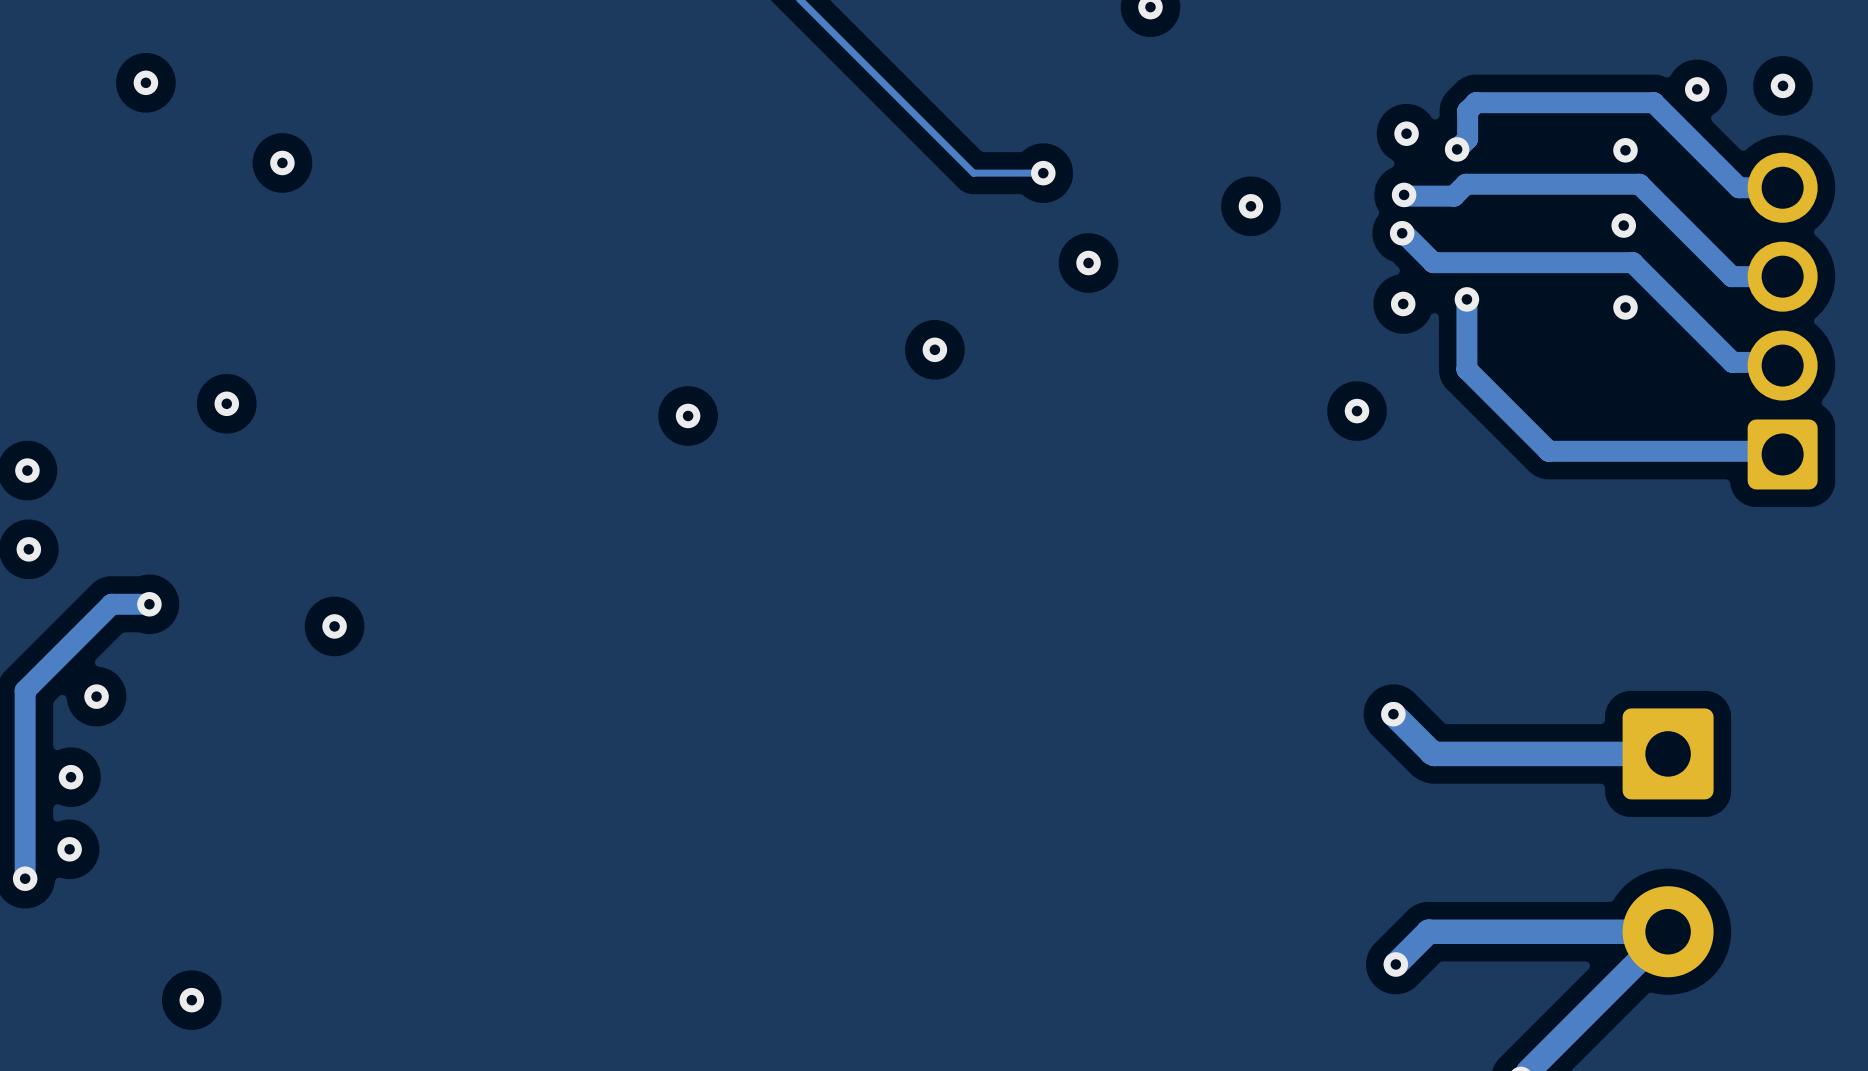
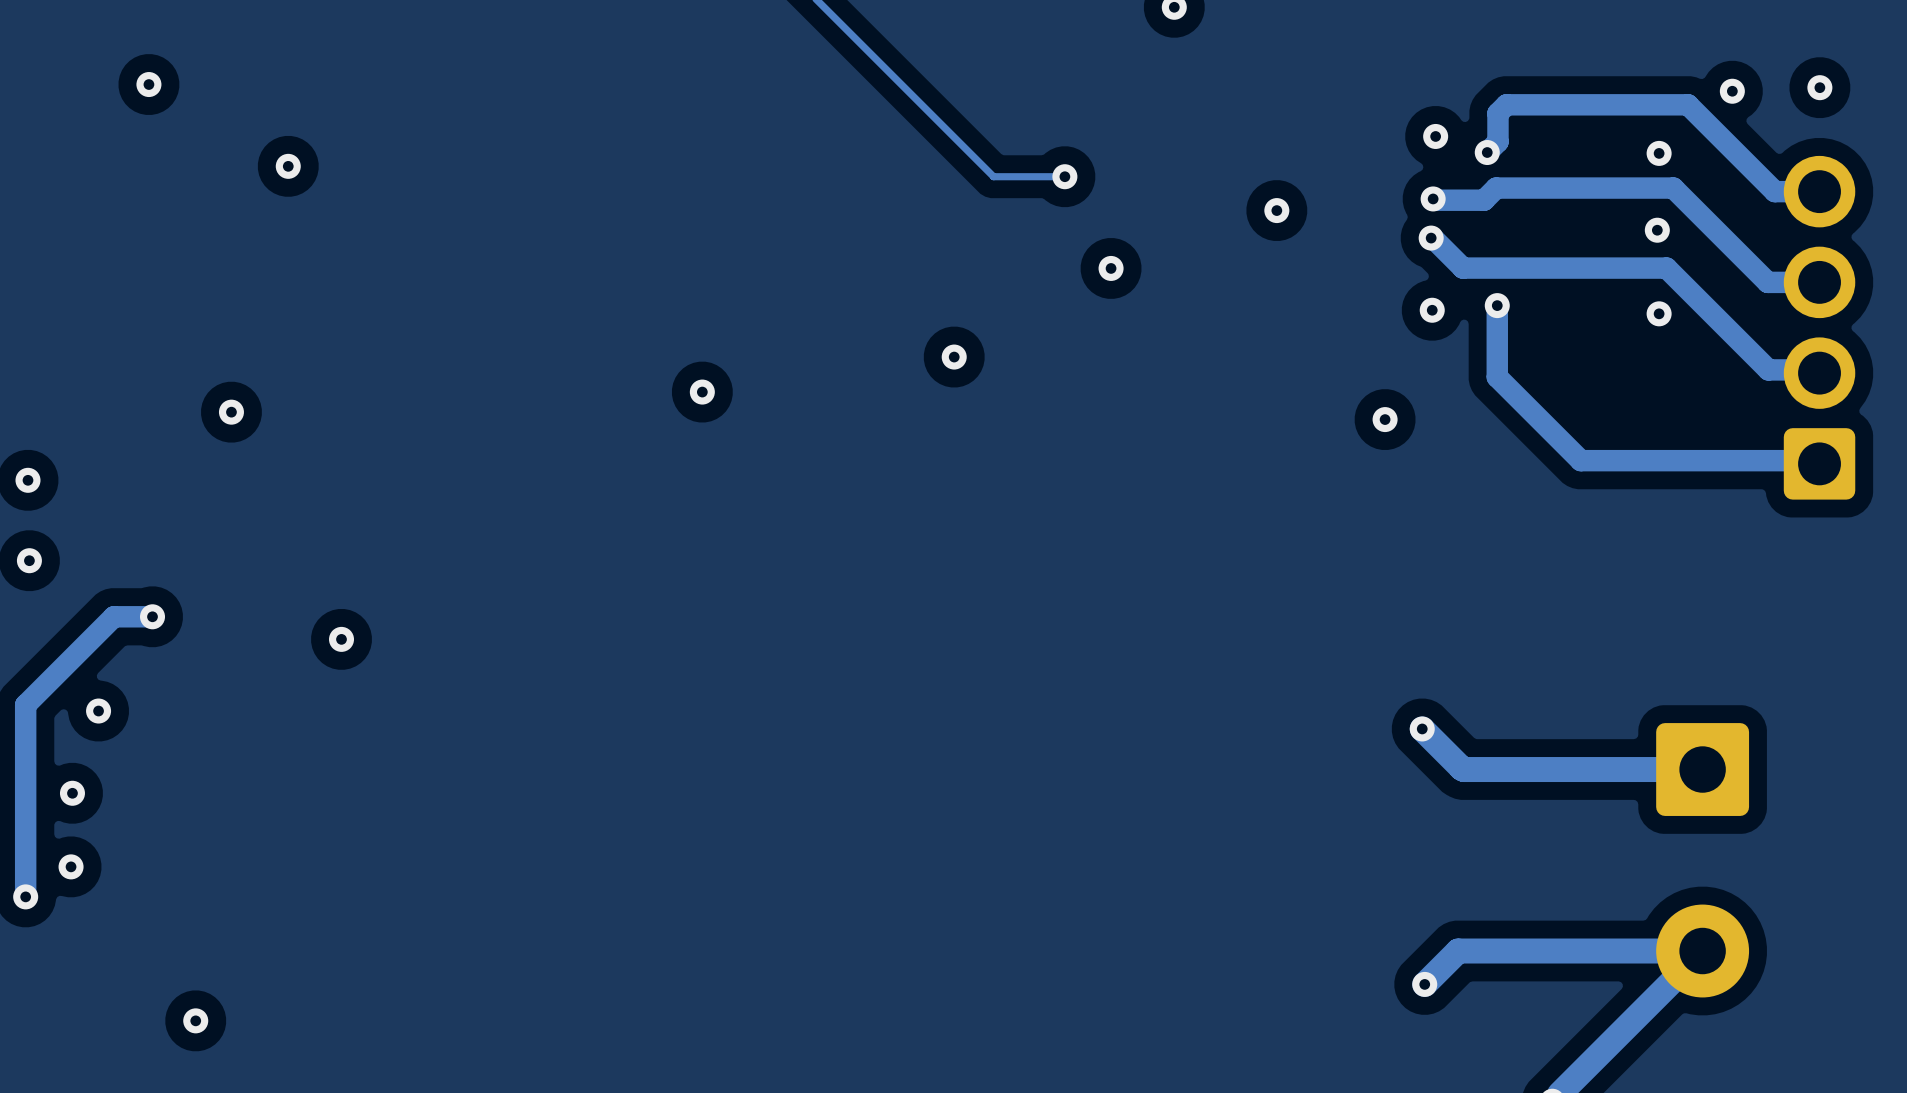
via position: (688, 415) -> (702, 392)

